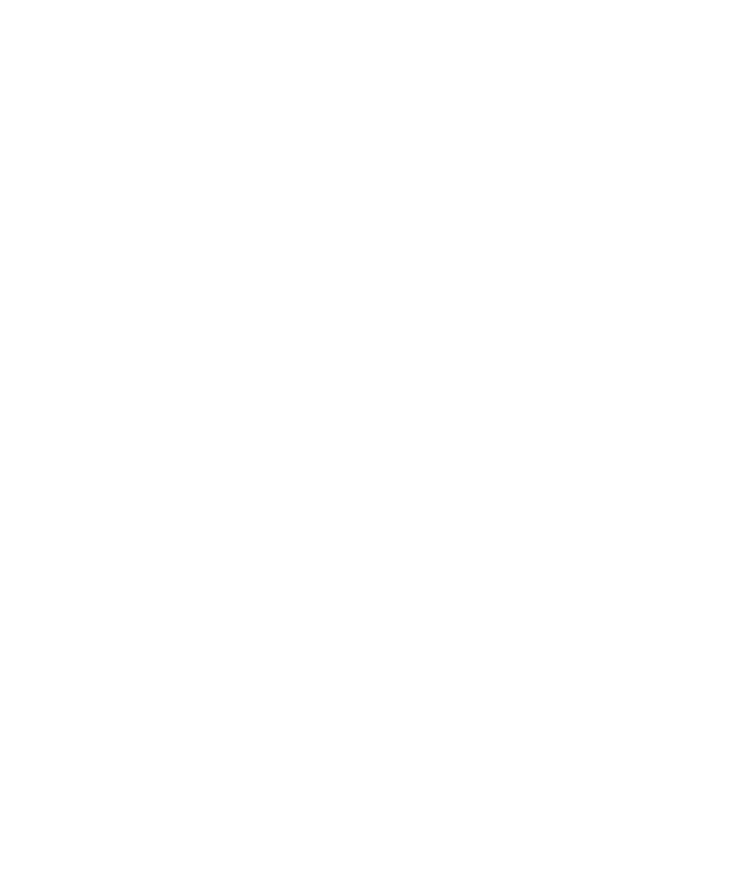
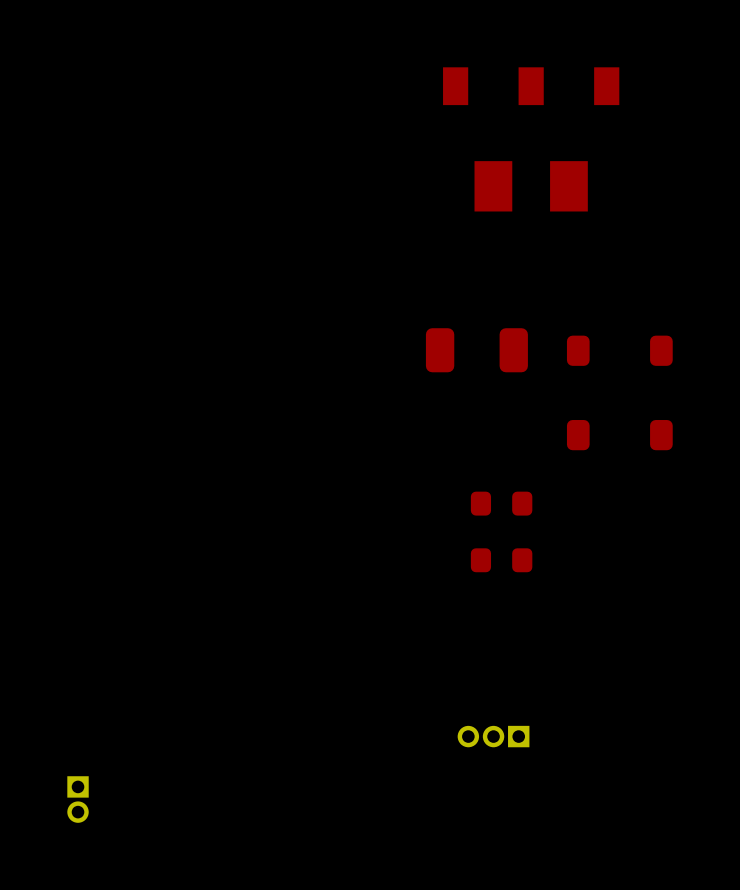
part: none -> (531, 139)
part: none -> (476, 350)
part: none -> (619, 350)
part: none -> (619, 435)
part: none -> (501, 503)
part: none -> (501, 560)
part: none -> (493, 736)
part: none -> (78, 799)

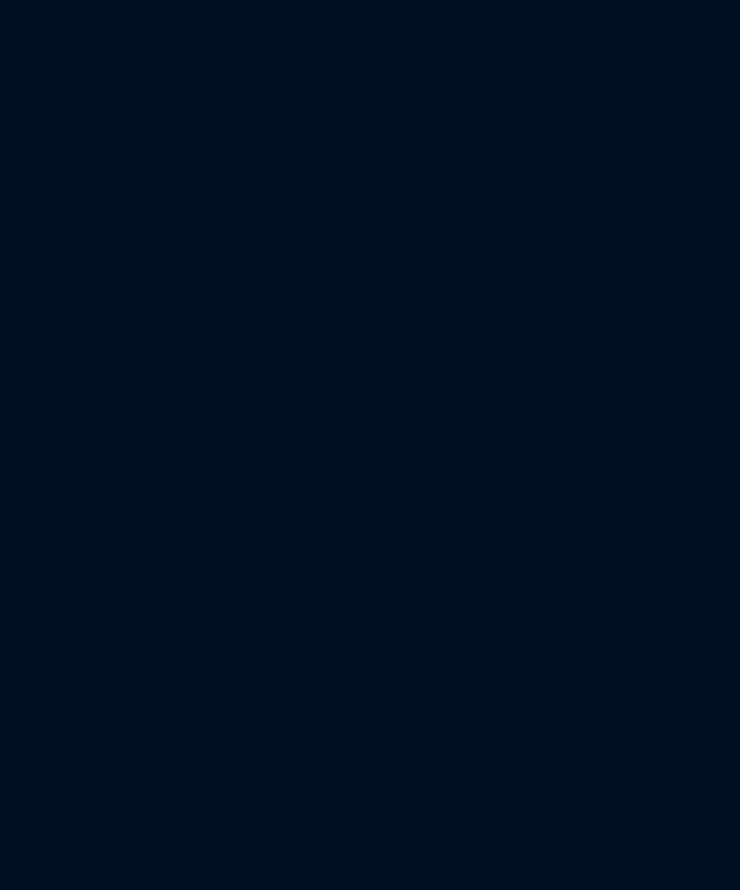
part: (531, 139) -> none
part: (476, 350) -> none
part: (619, 350) -> none
part: (619, 435) -> none
part: (501, 503) -> none
part: (501, 560) -> none
part: (493, 736) -> none
part: (78, 799) -> none

